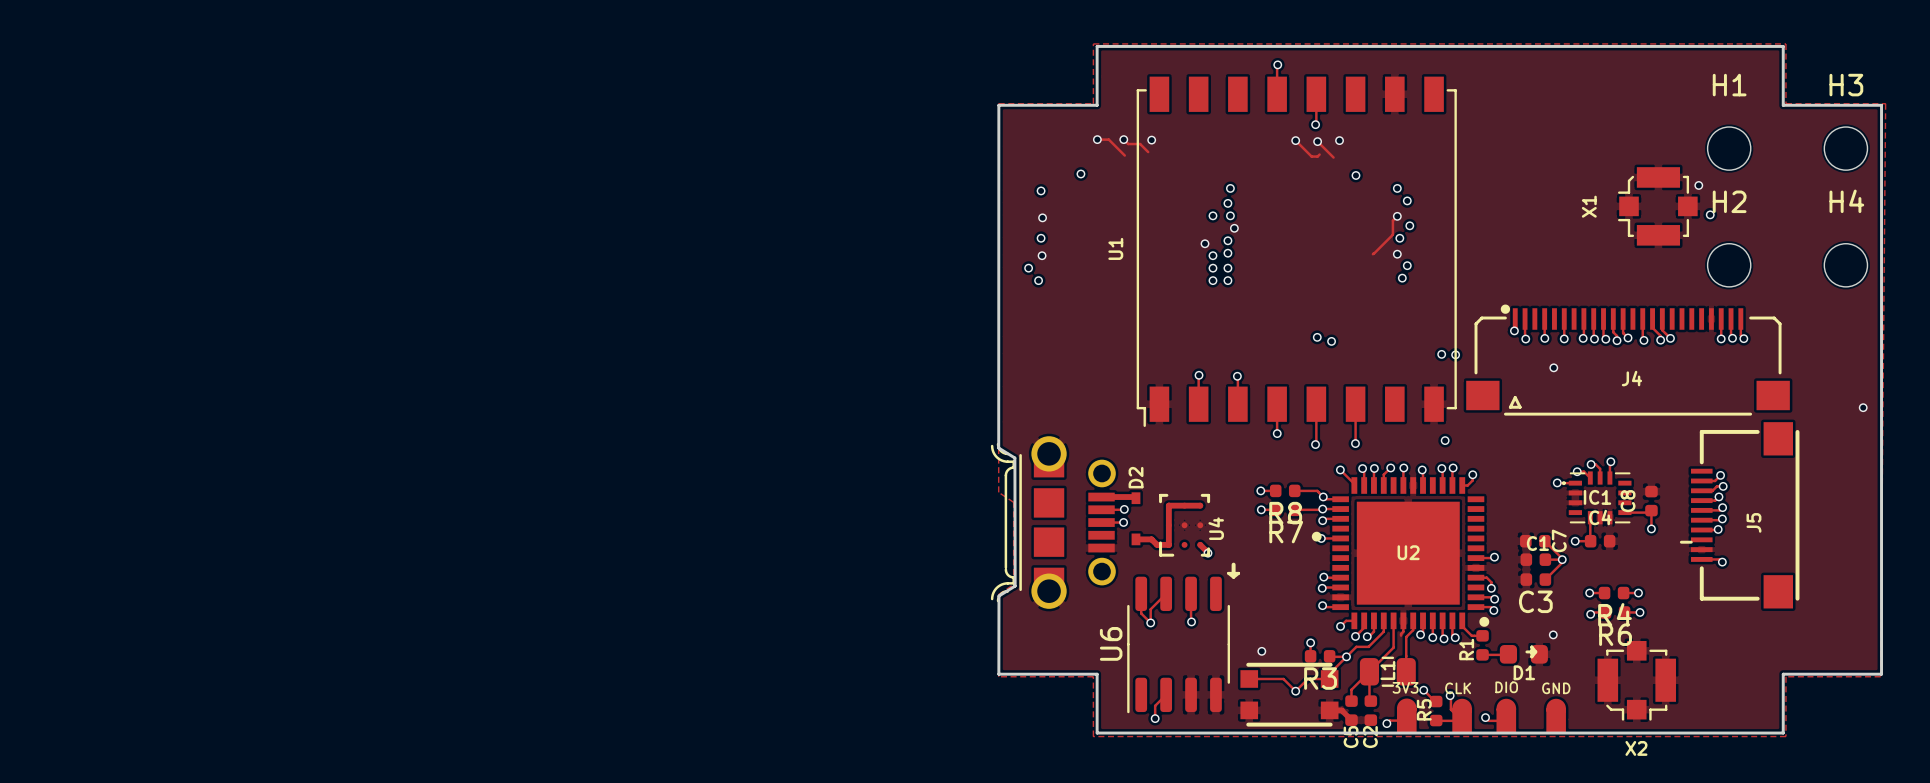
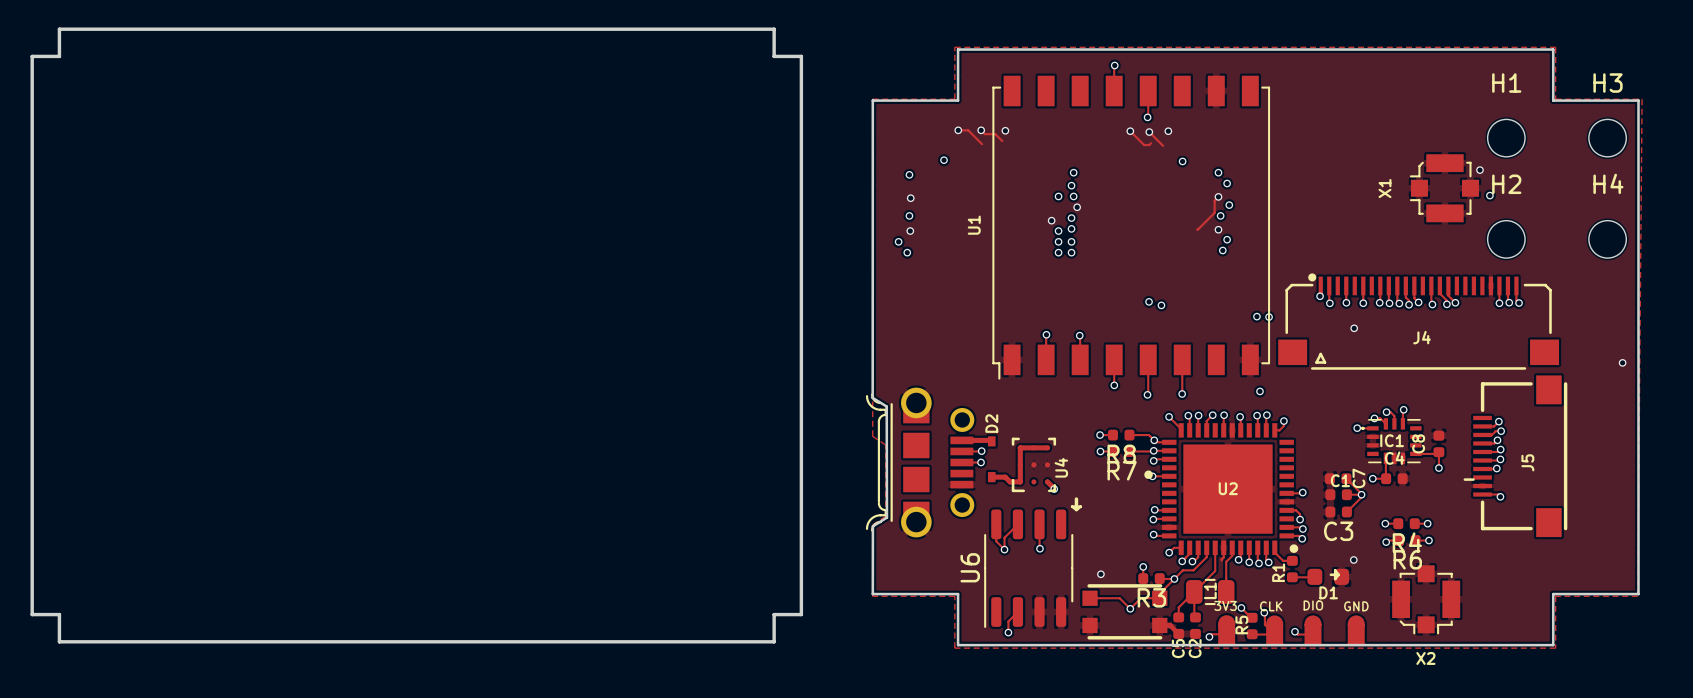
board edge: none -> (59, 29) (59, 56) (32, 56) (32, 614) (59, 614) (59, 641) (774, 641) (774, 614) (801, 614) (801, 56) (774, 56) (774, 29) (59, 29)

